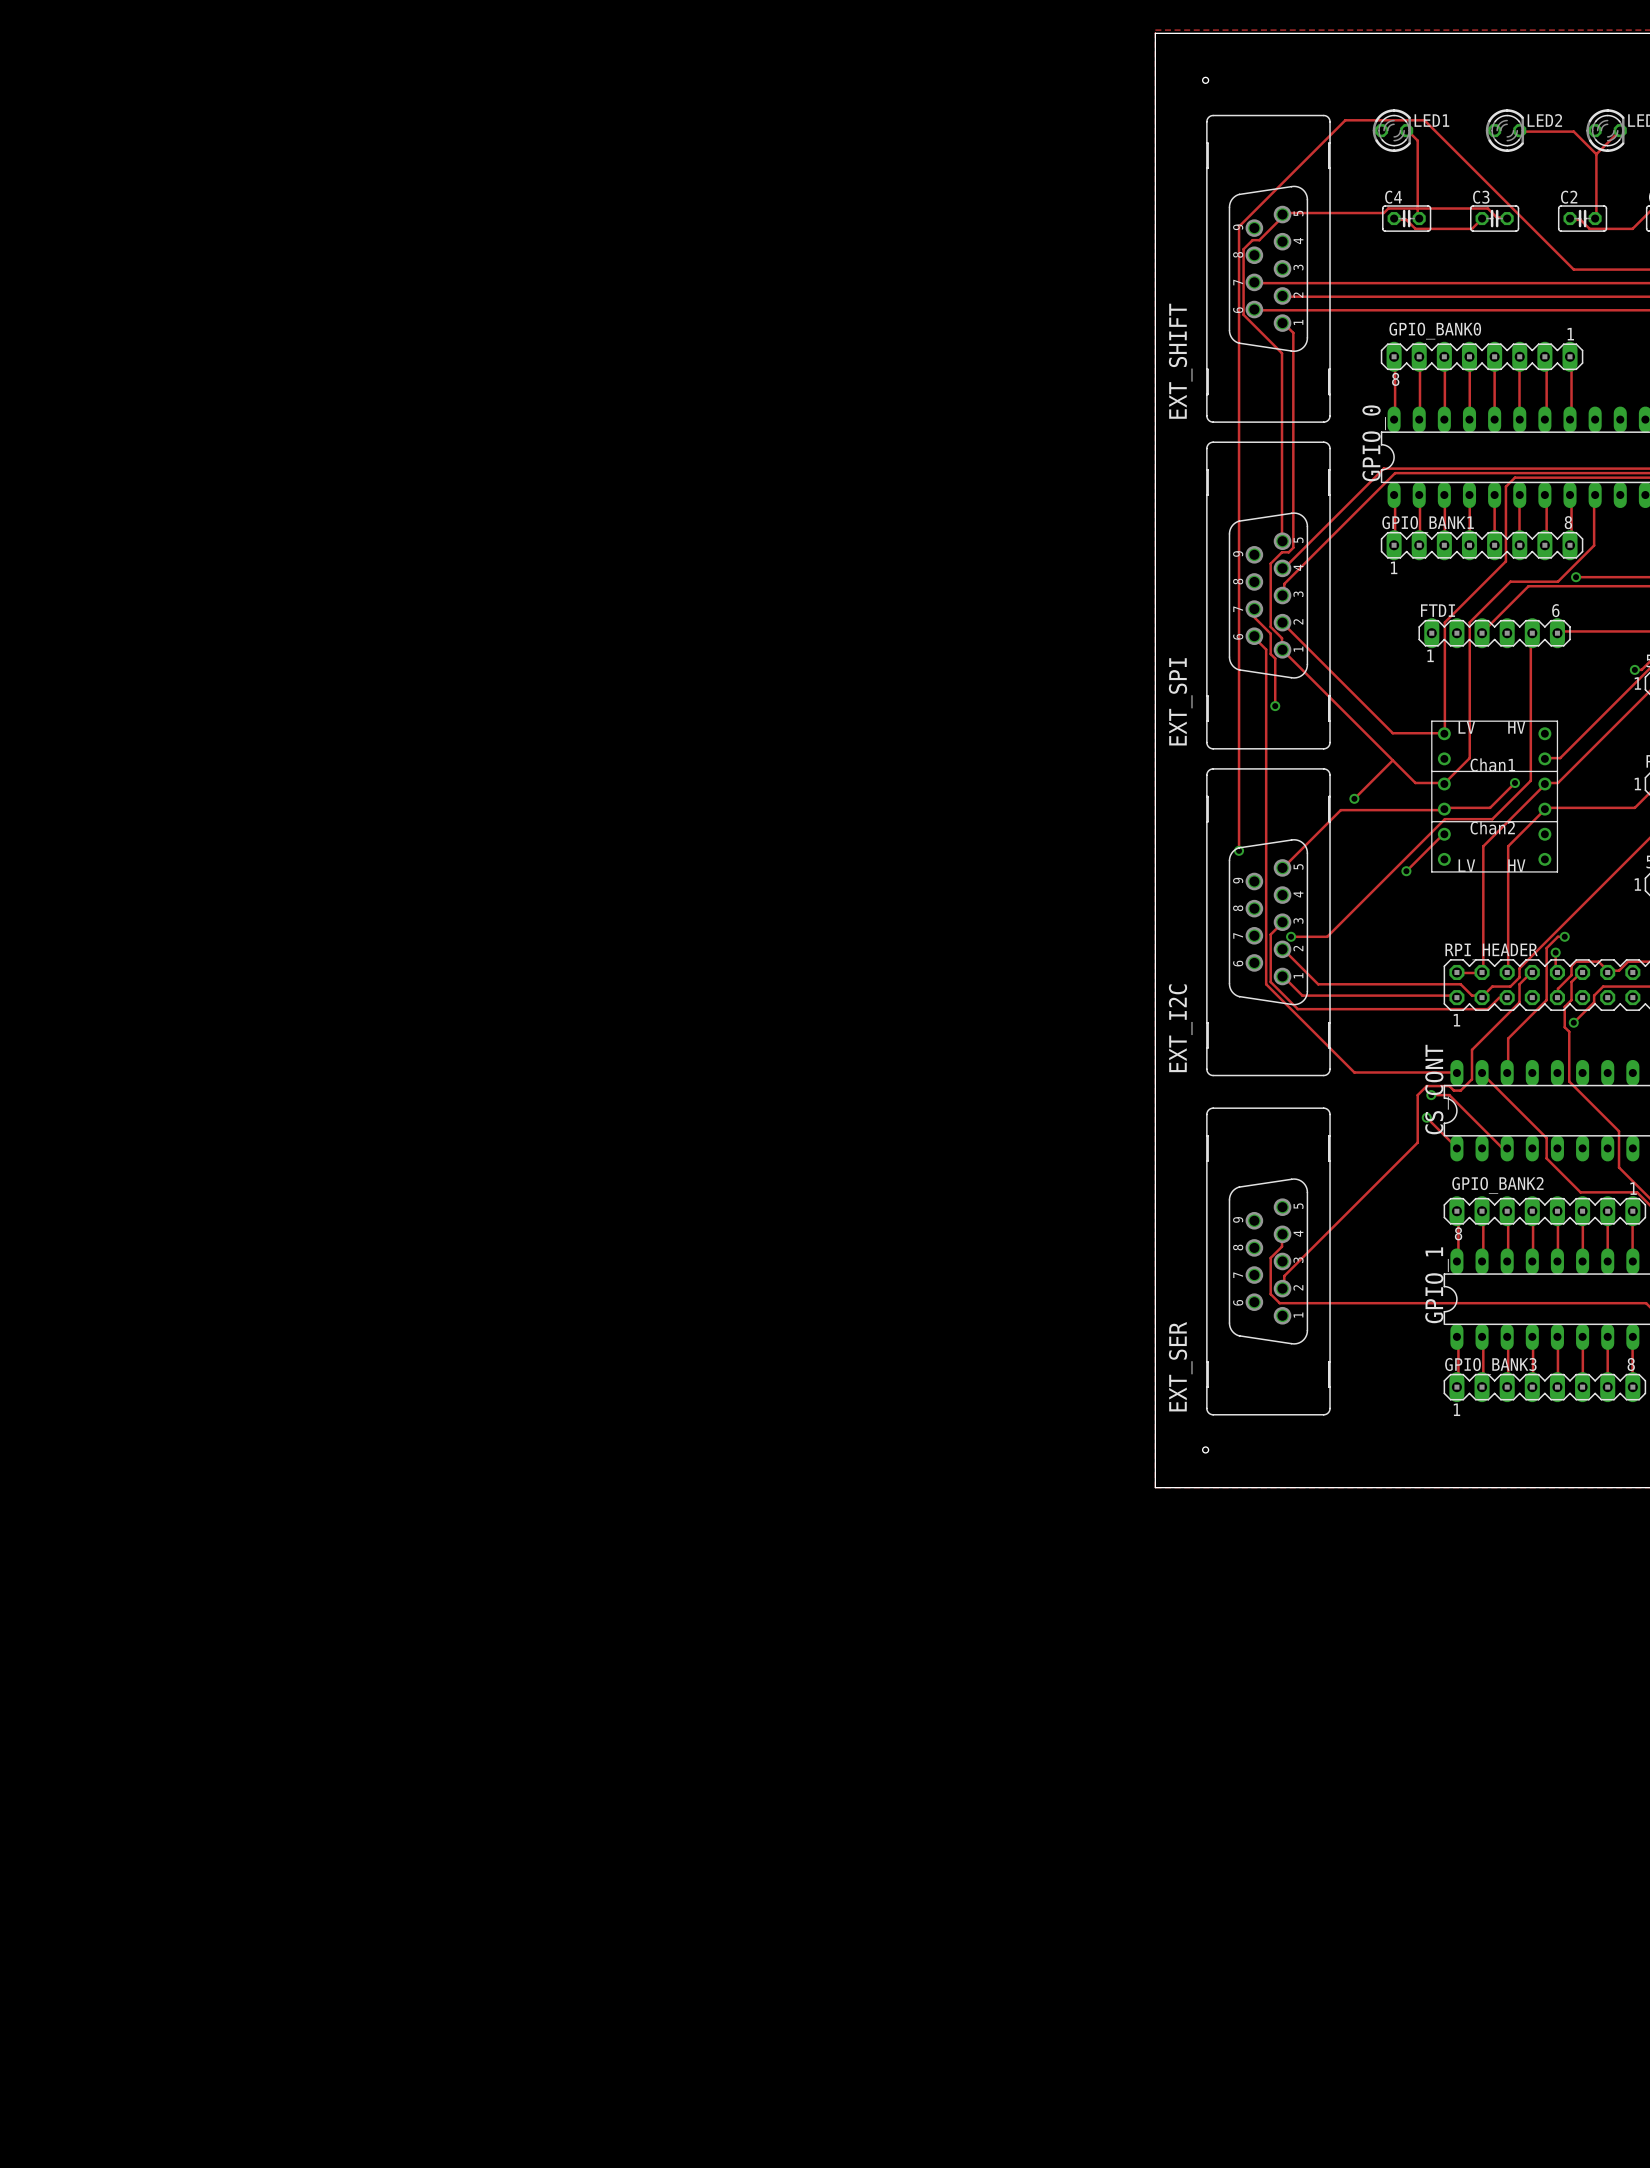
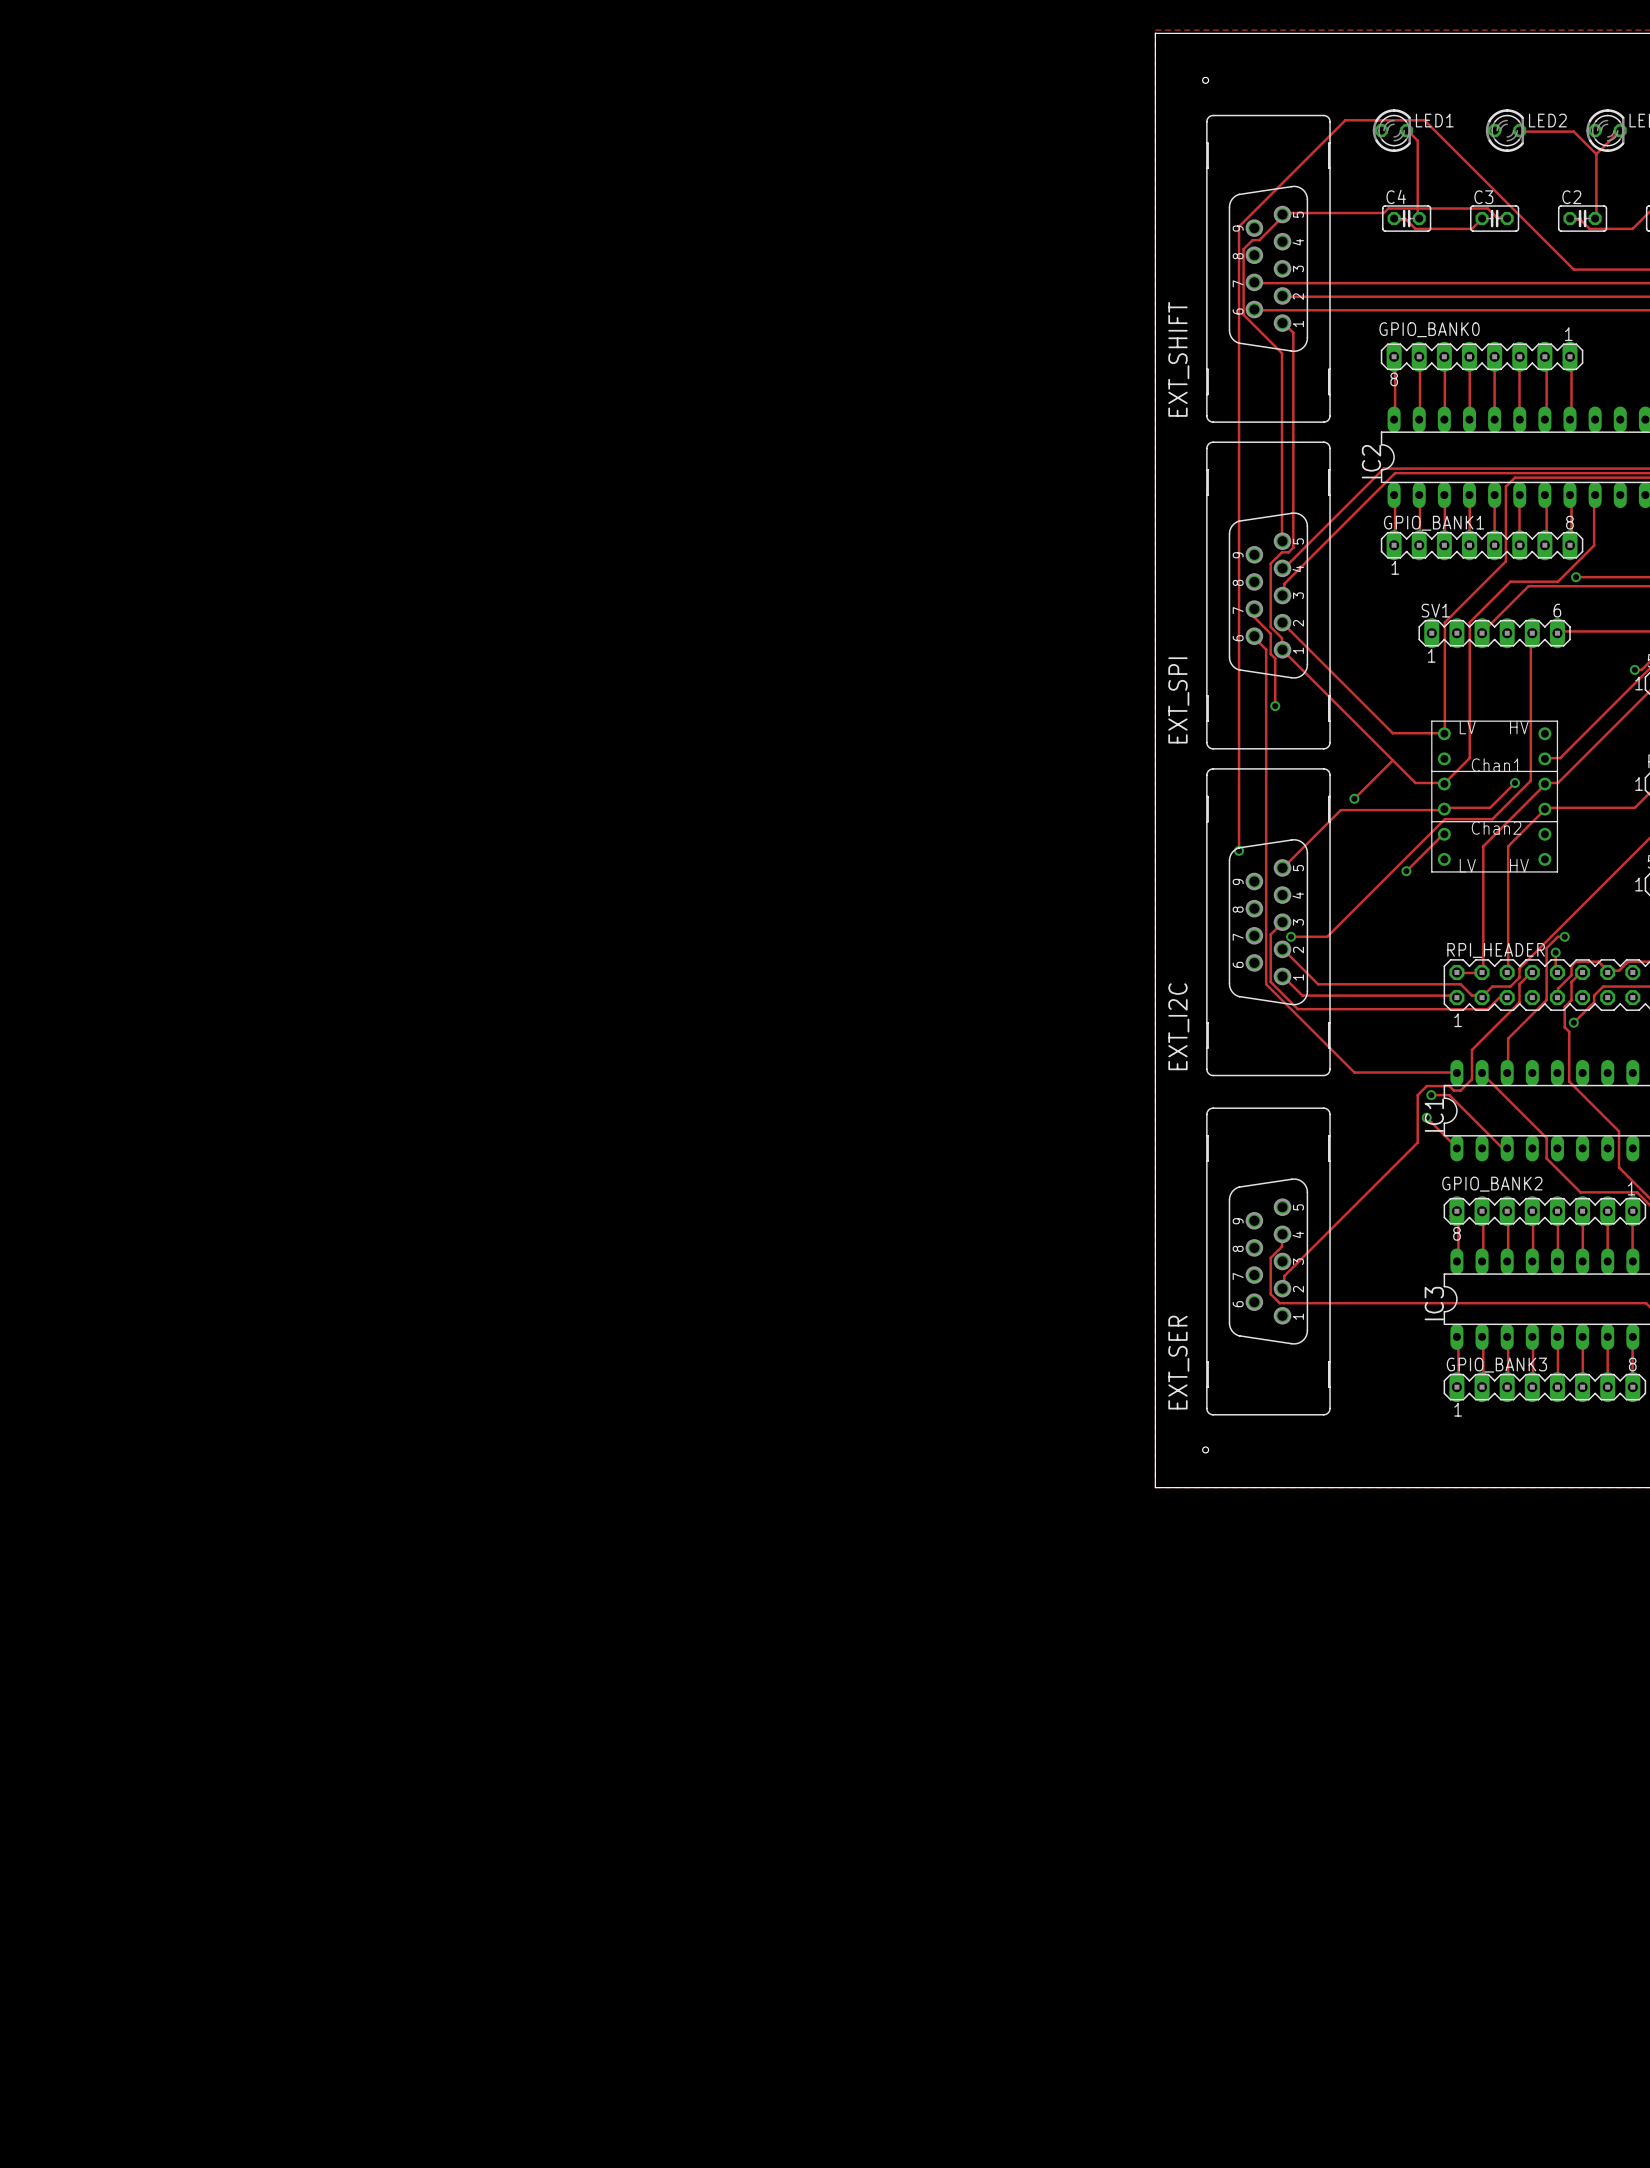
GPIO_0 name: GPIO_0 (1374, 443) -> IC2 (1371, 461)
FTDI name: FTDI (1438, 610) -> SV1 (1435, 610)
CS_CONT name: CS_CONT (1436, 1089) -> IC1 (1434, 1115)
GPIO_1 name: GPIO_1 (1436, 1285) -> IC3 (1434, 1303)

